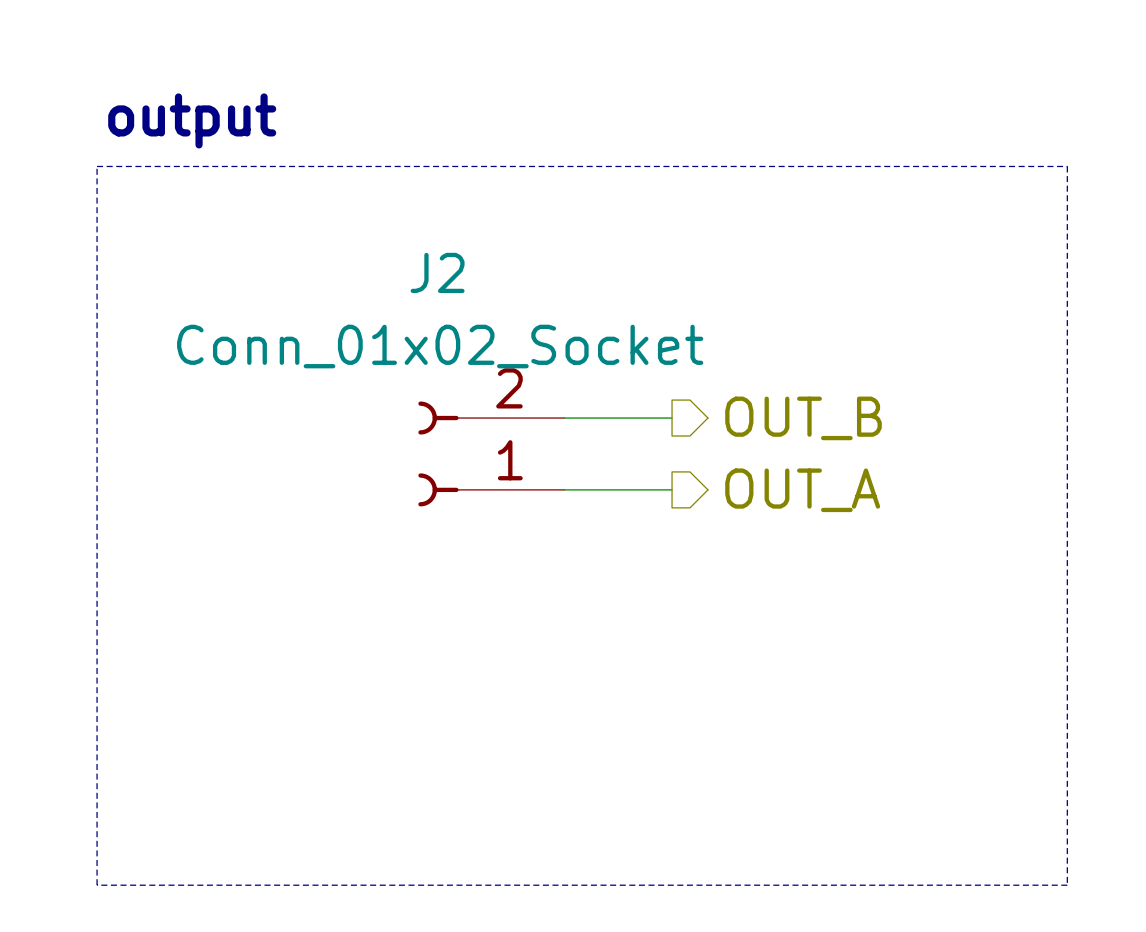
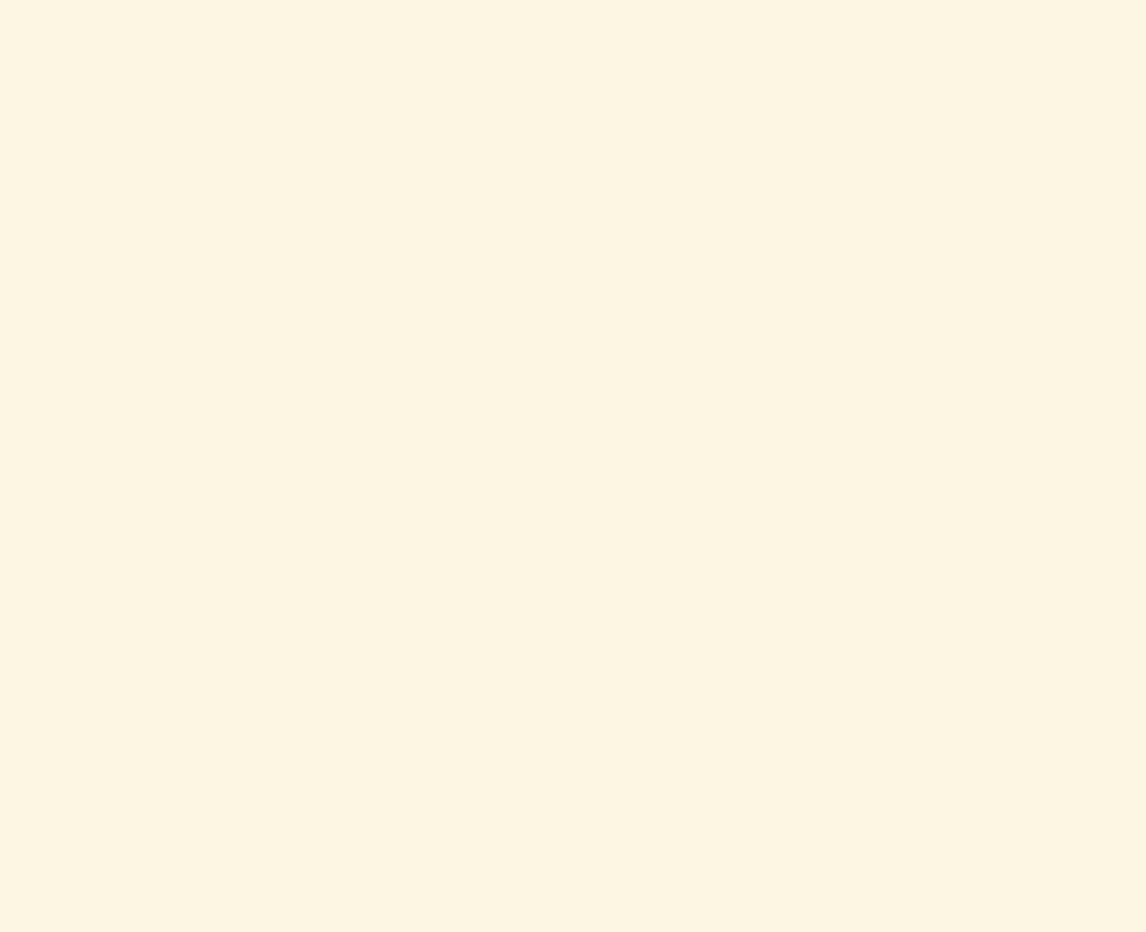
text: output (192, 120) -> none
line: (97, 166) (1067, 166) (1067, 885) (97, 885) (97, 166) -> none
wire: (564, 418) (672, 418) -> none
hierarchical label: OUT_B (803, 418) -> none
J2: Conn_01x02_Socket (491, 453) -> none
wire: (564, 489) (672, 489) -> none
hierarchical label: OUT_A (802, 490) -> none

